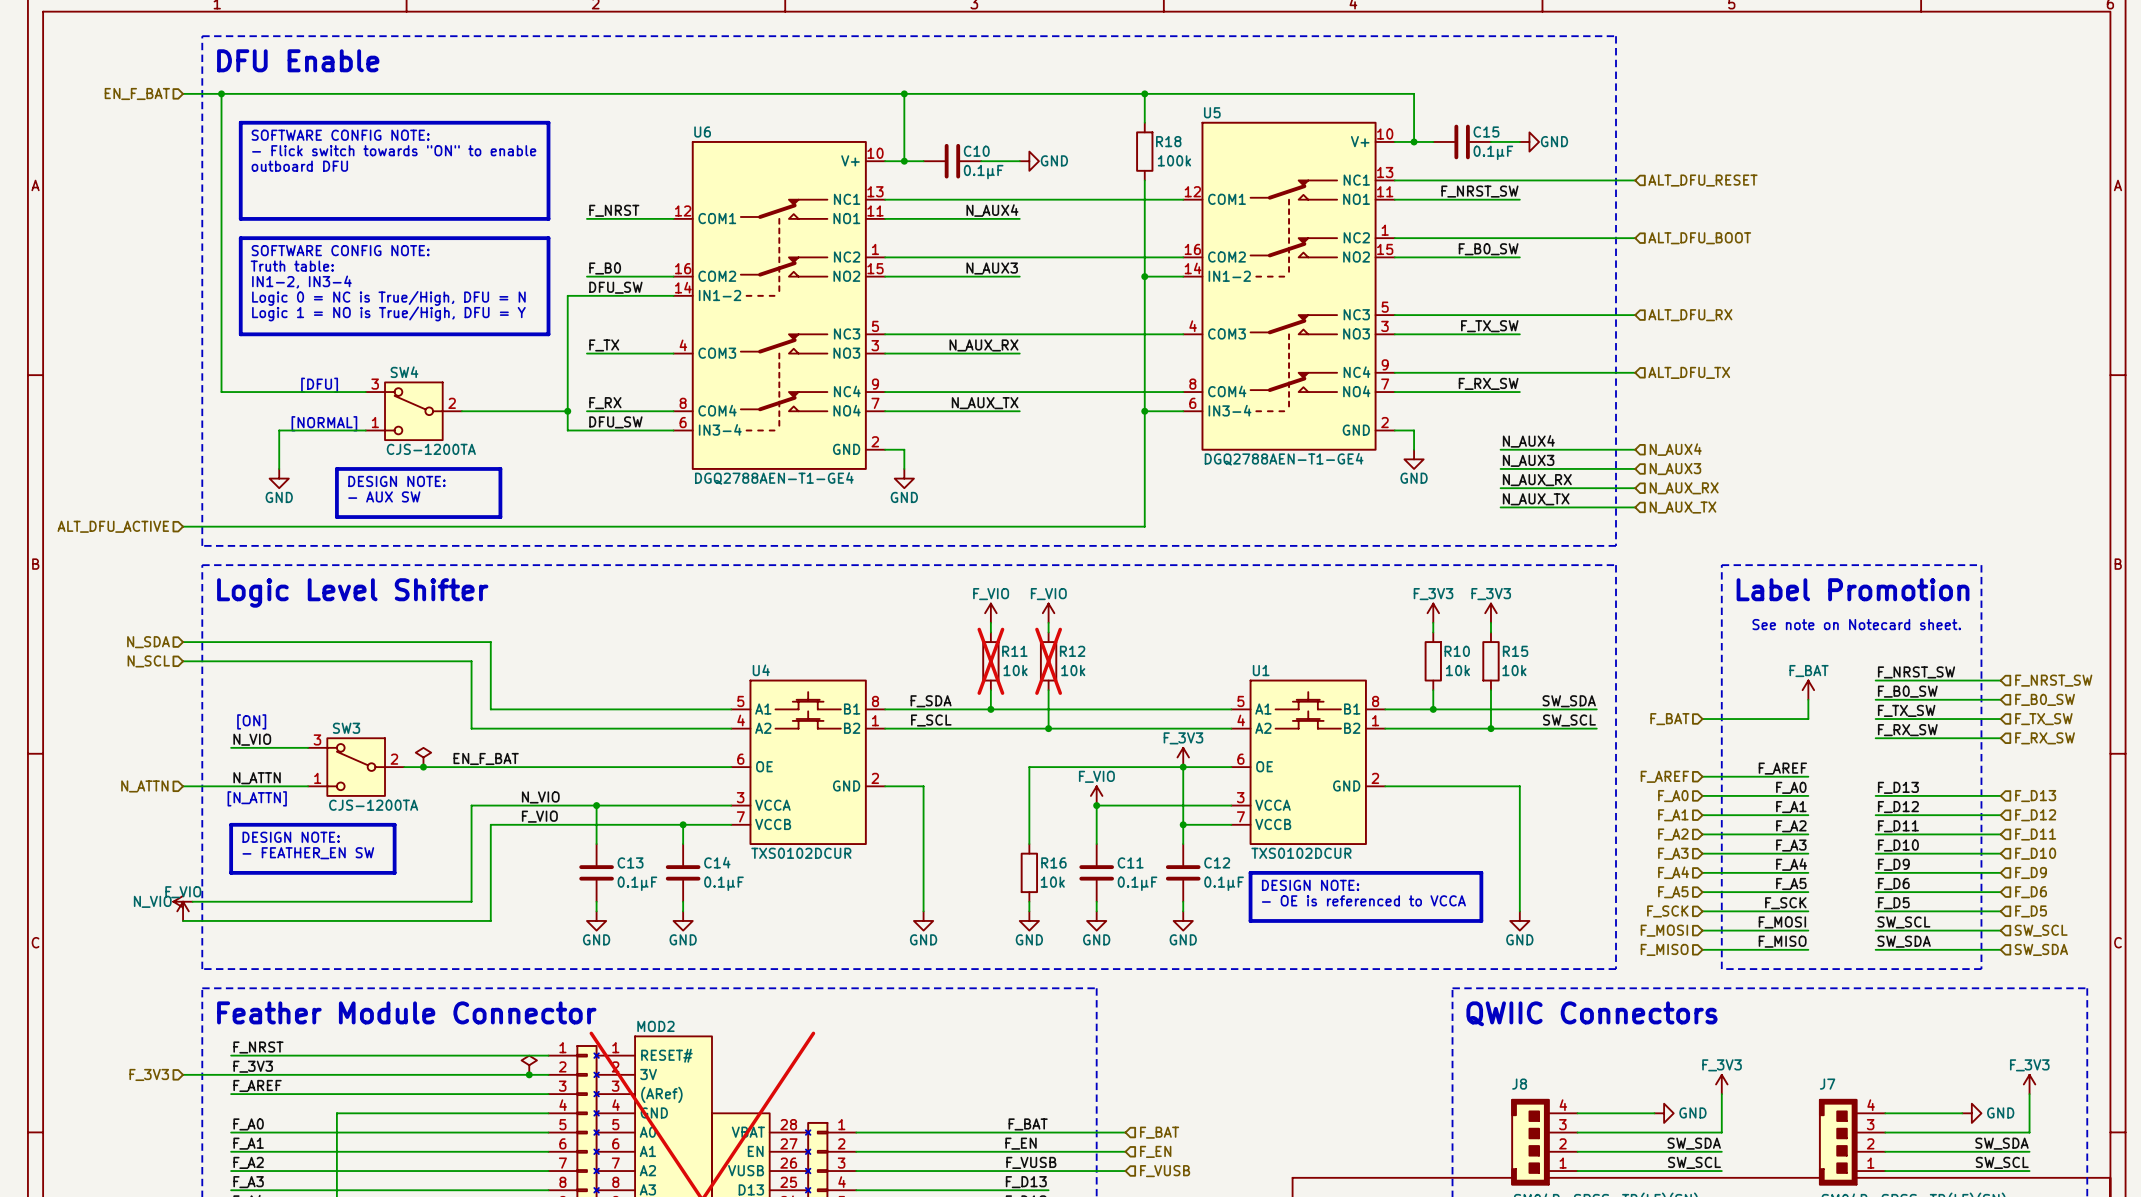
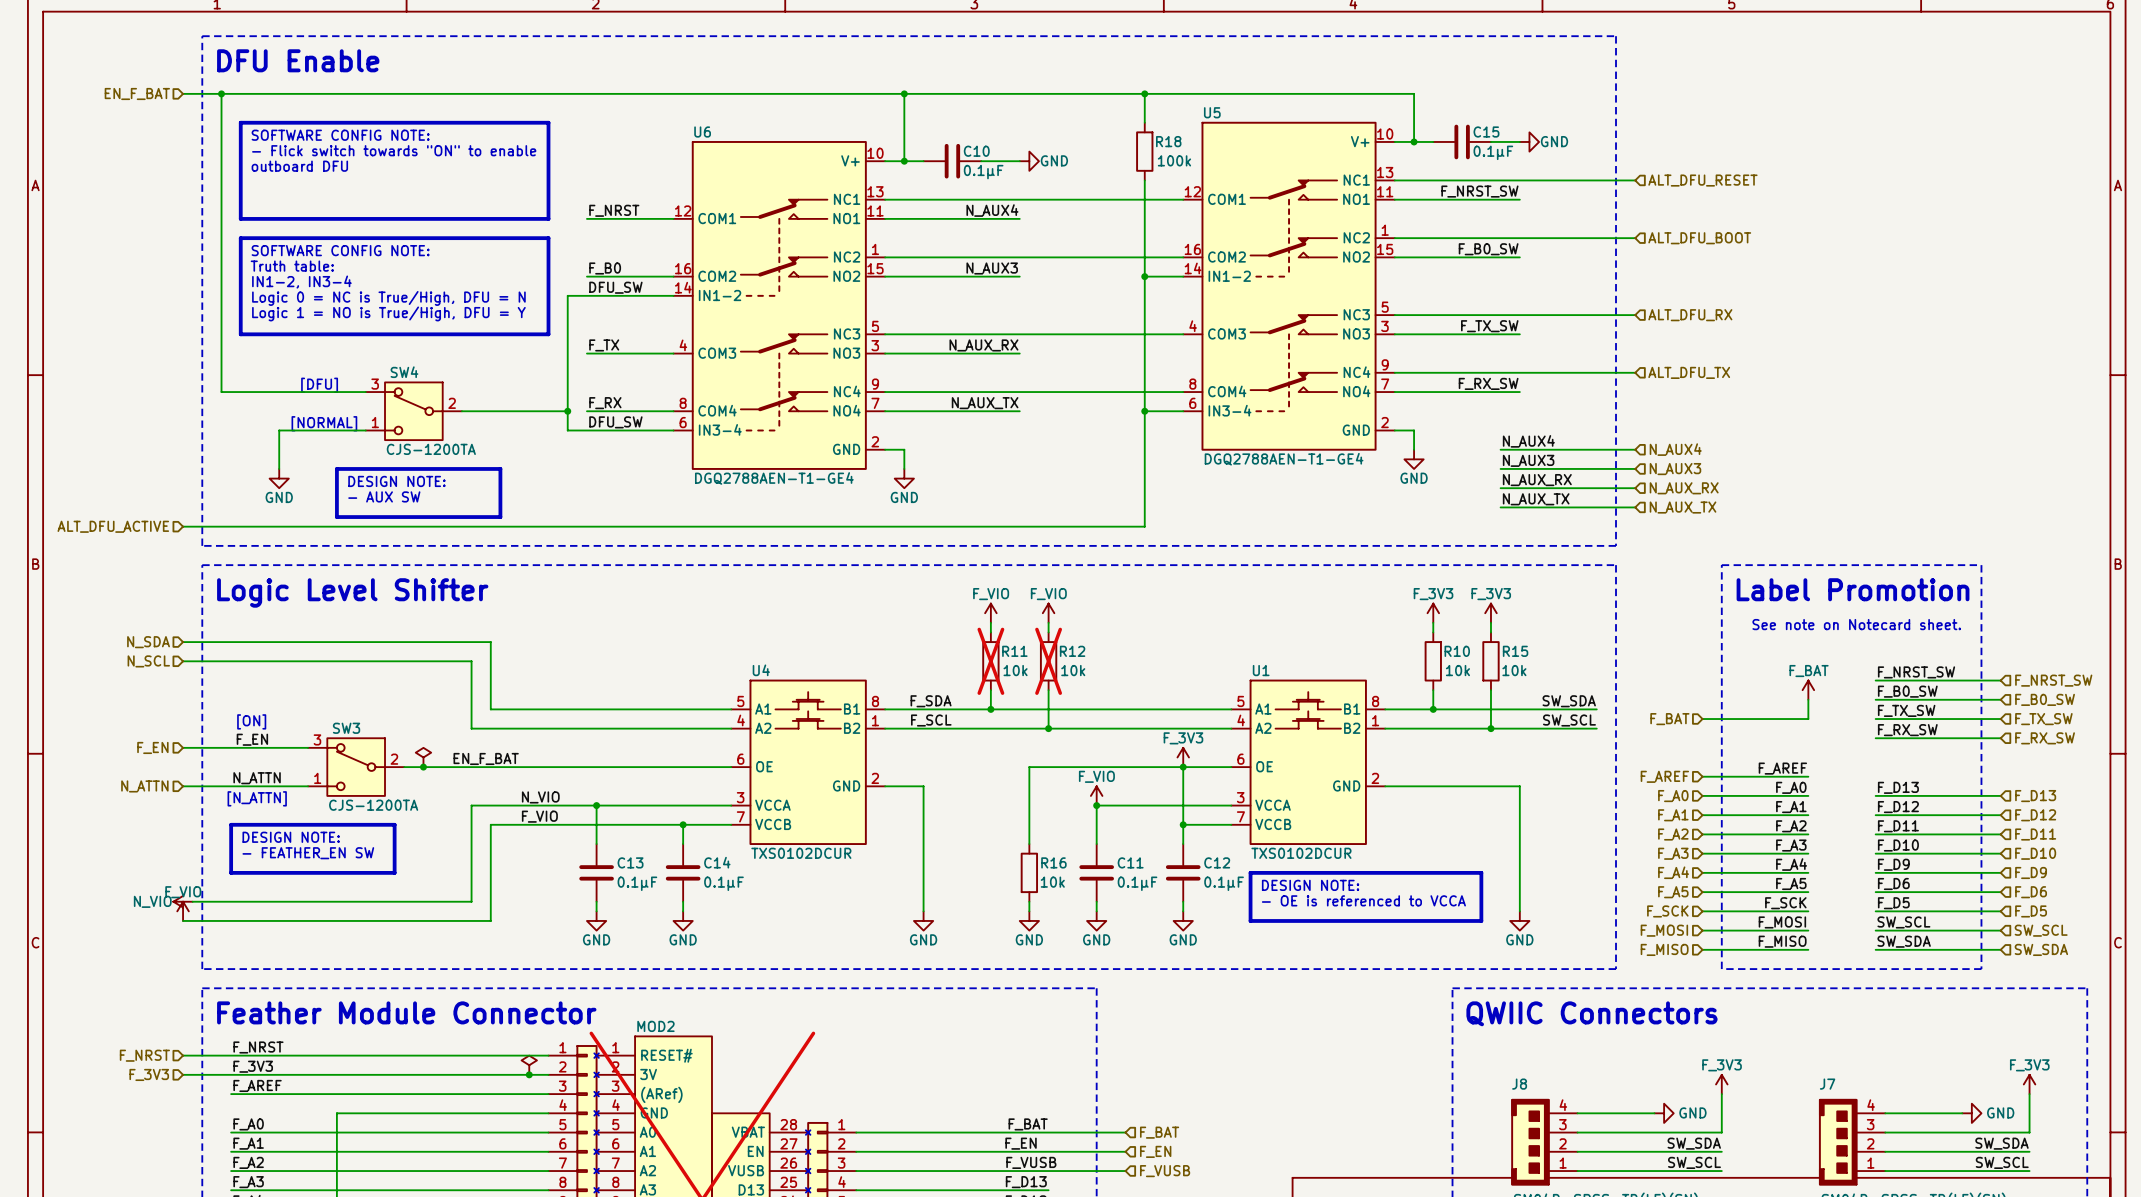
label: N_VIO (252, 739) -> F_EN (252, 739)
hierarchical label: none -> F_EN (152, 747)
wire: none -> (183, 747) (231, 747)
hierarchical label: none -> F_NRST (144, 1055)
wire: none -> (183, 1055) (231, 1055)

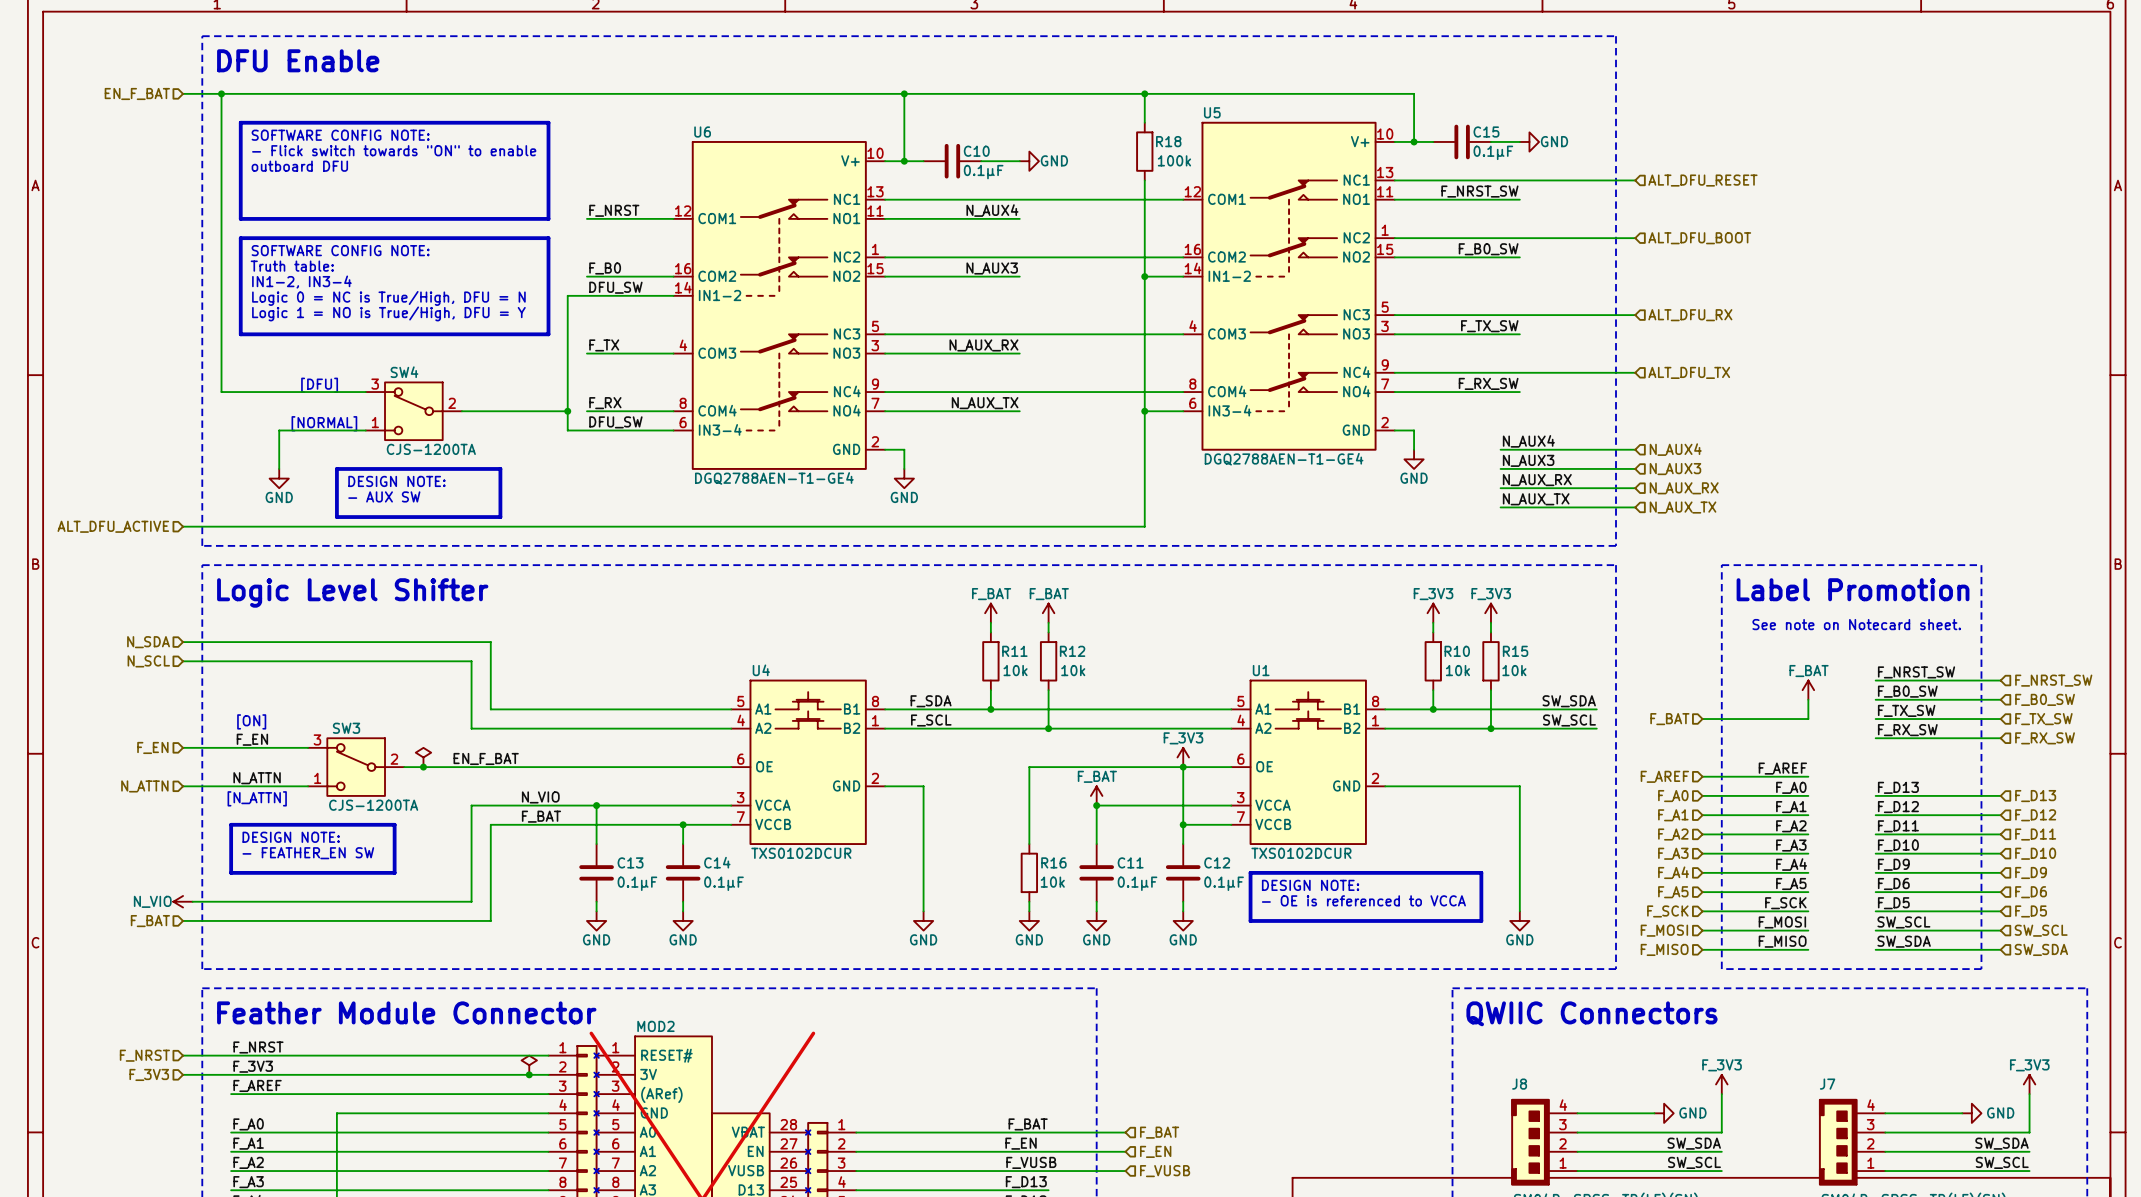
power symbol: F_VIO (990, 613) -> F_BAT (990, 613)
power symbol: F_VIO (1048, 613) -> F_BAT (1048, 613)
R11 do-not-place cross: (990, 661) -> none
R12 do-not-place cross: (1048, 661) -> none
power symbol: F_VIO (1096, 795) -> F_BAT (1096, 795)
label: F_VIO (539, 816) -> F_BAT (541, 816)
power symbol: F_VIO (183, 911) -> none
hierarchical label: none -> F_BAT (150, 921)

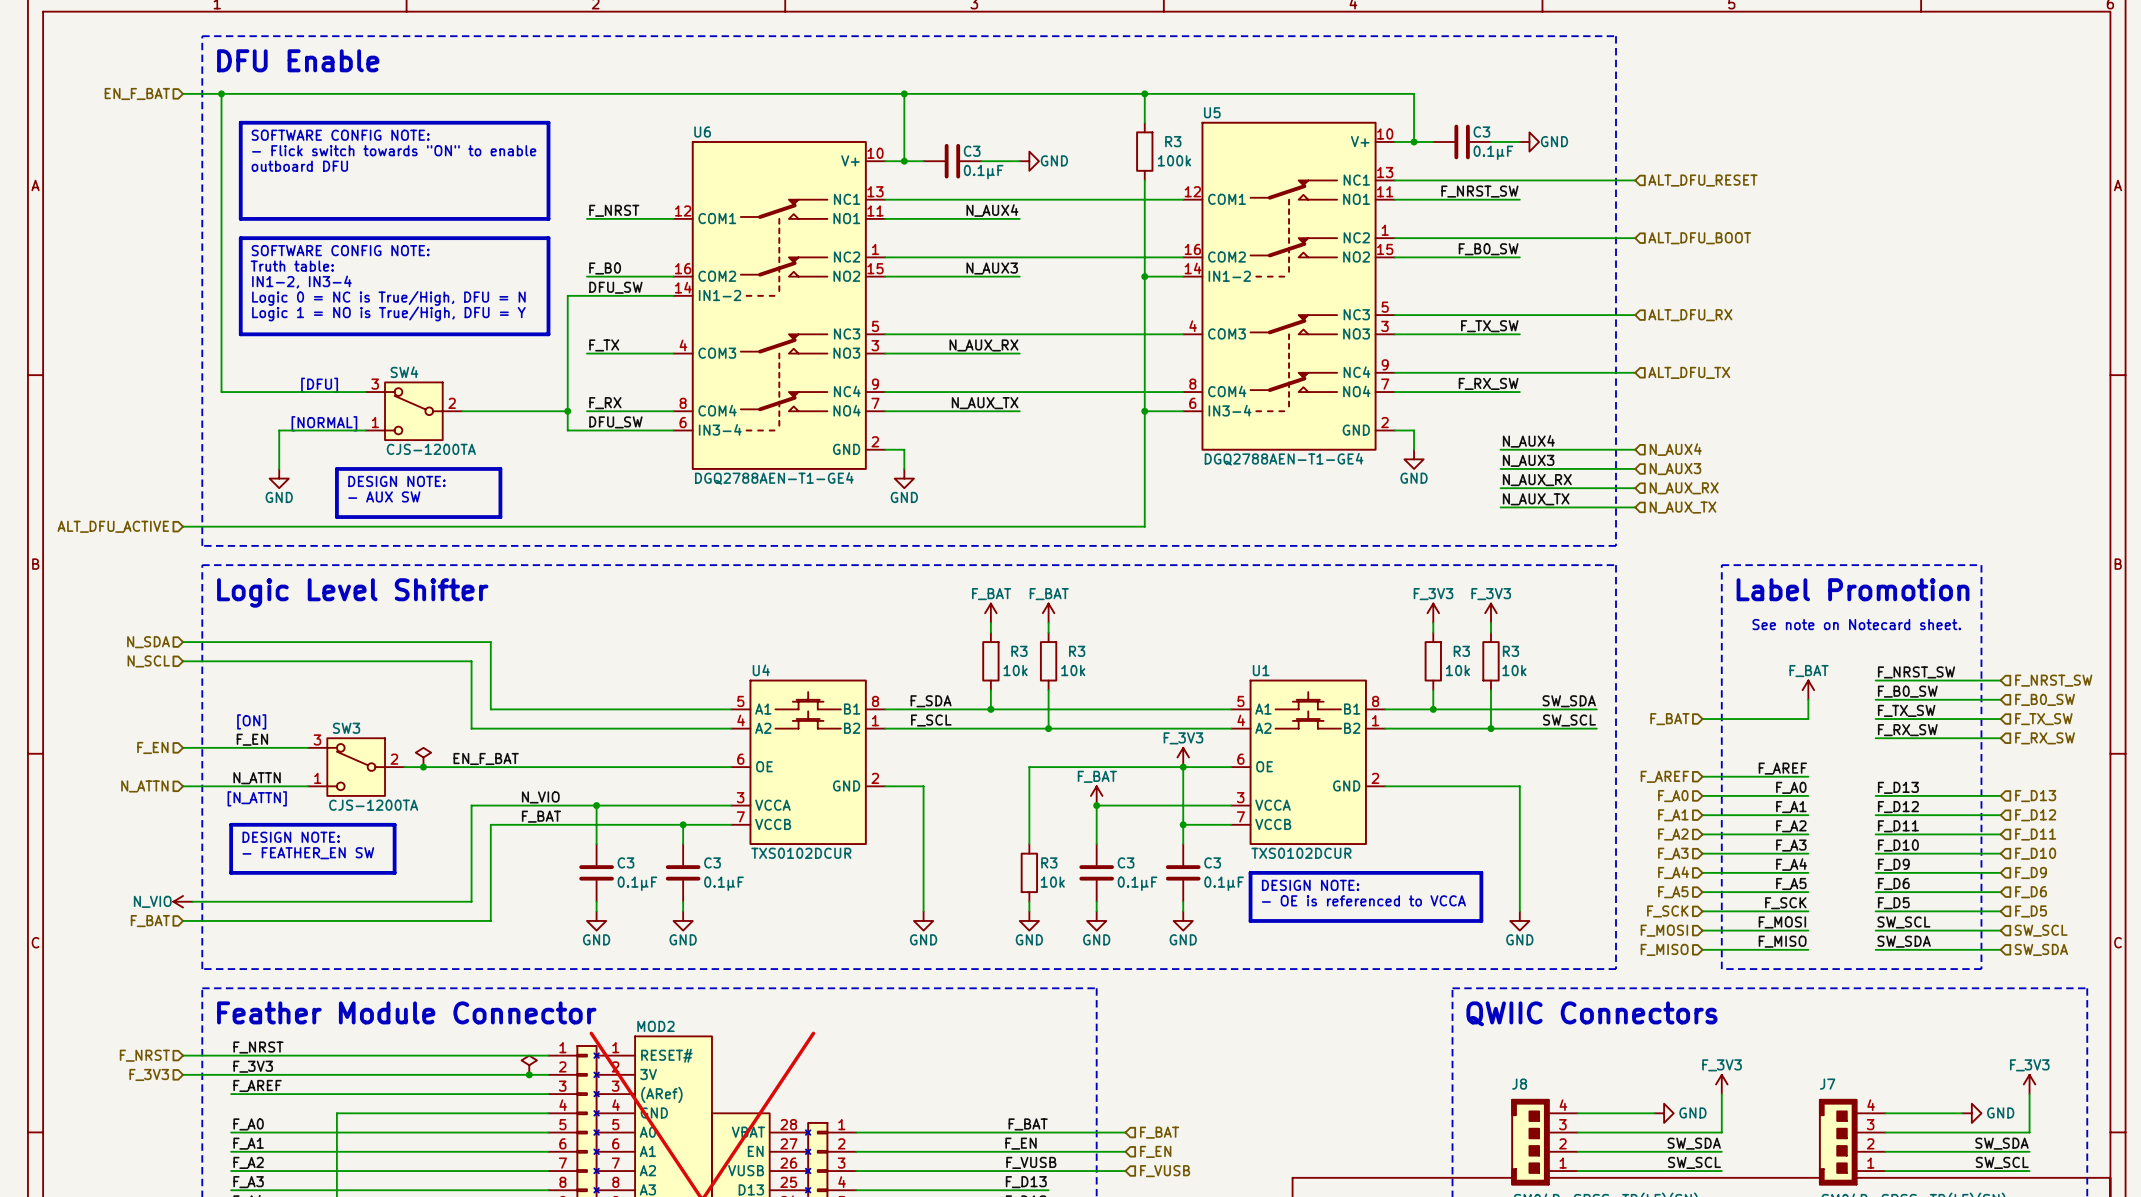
C15 name: C15 (1486, 132) -> C3 (1481, 132)
R18 name: R18 (1168, 141) -> R3 (1173, 141)
C10 name: C10 (976, 151) -> C3 (972, 151)
R11 name: R11 (1014, 651) -> R3 (1019, 651)
R12 name: R12 (1072, 651) -> R3 (1077, 651)
R10 name: R10 (1457, 651) -> R3 (1461, 651)
R15 name: R15 (1515, 651) -> R3 (1510, 651)
C13 name: C13 (630, 862) -> C3 (625, 862)
C14 name: C14 (717, 862) -> C3 (712, 862)
R16 name: R16 (1053, 862) -> R3 (1049, 862)
C11 name: C11 (1130, 862) -> C3 (1126, 862)
C12 name: C12 (1217, 862) -> C3 (1212, 862)

